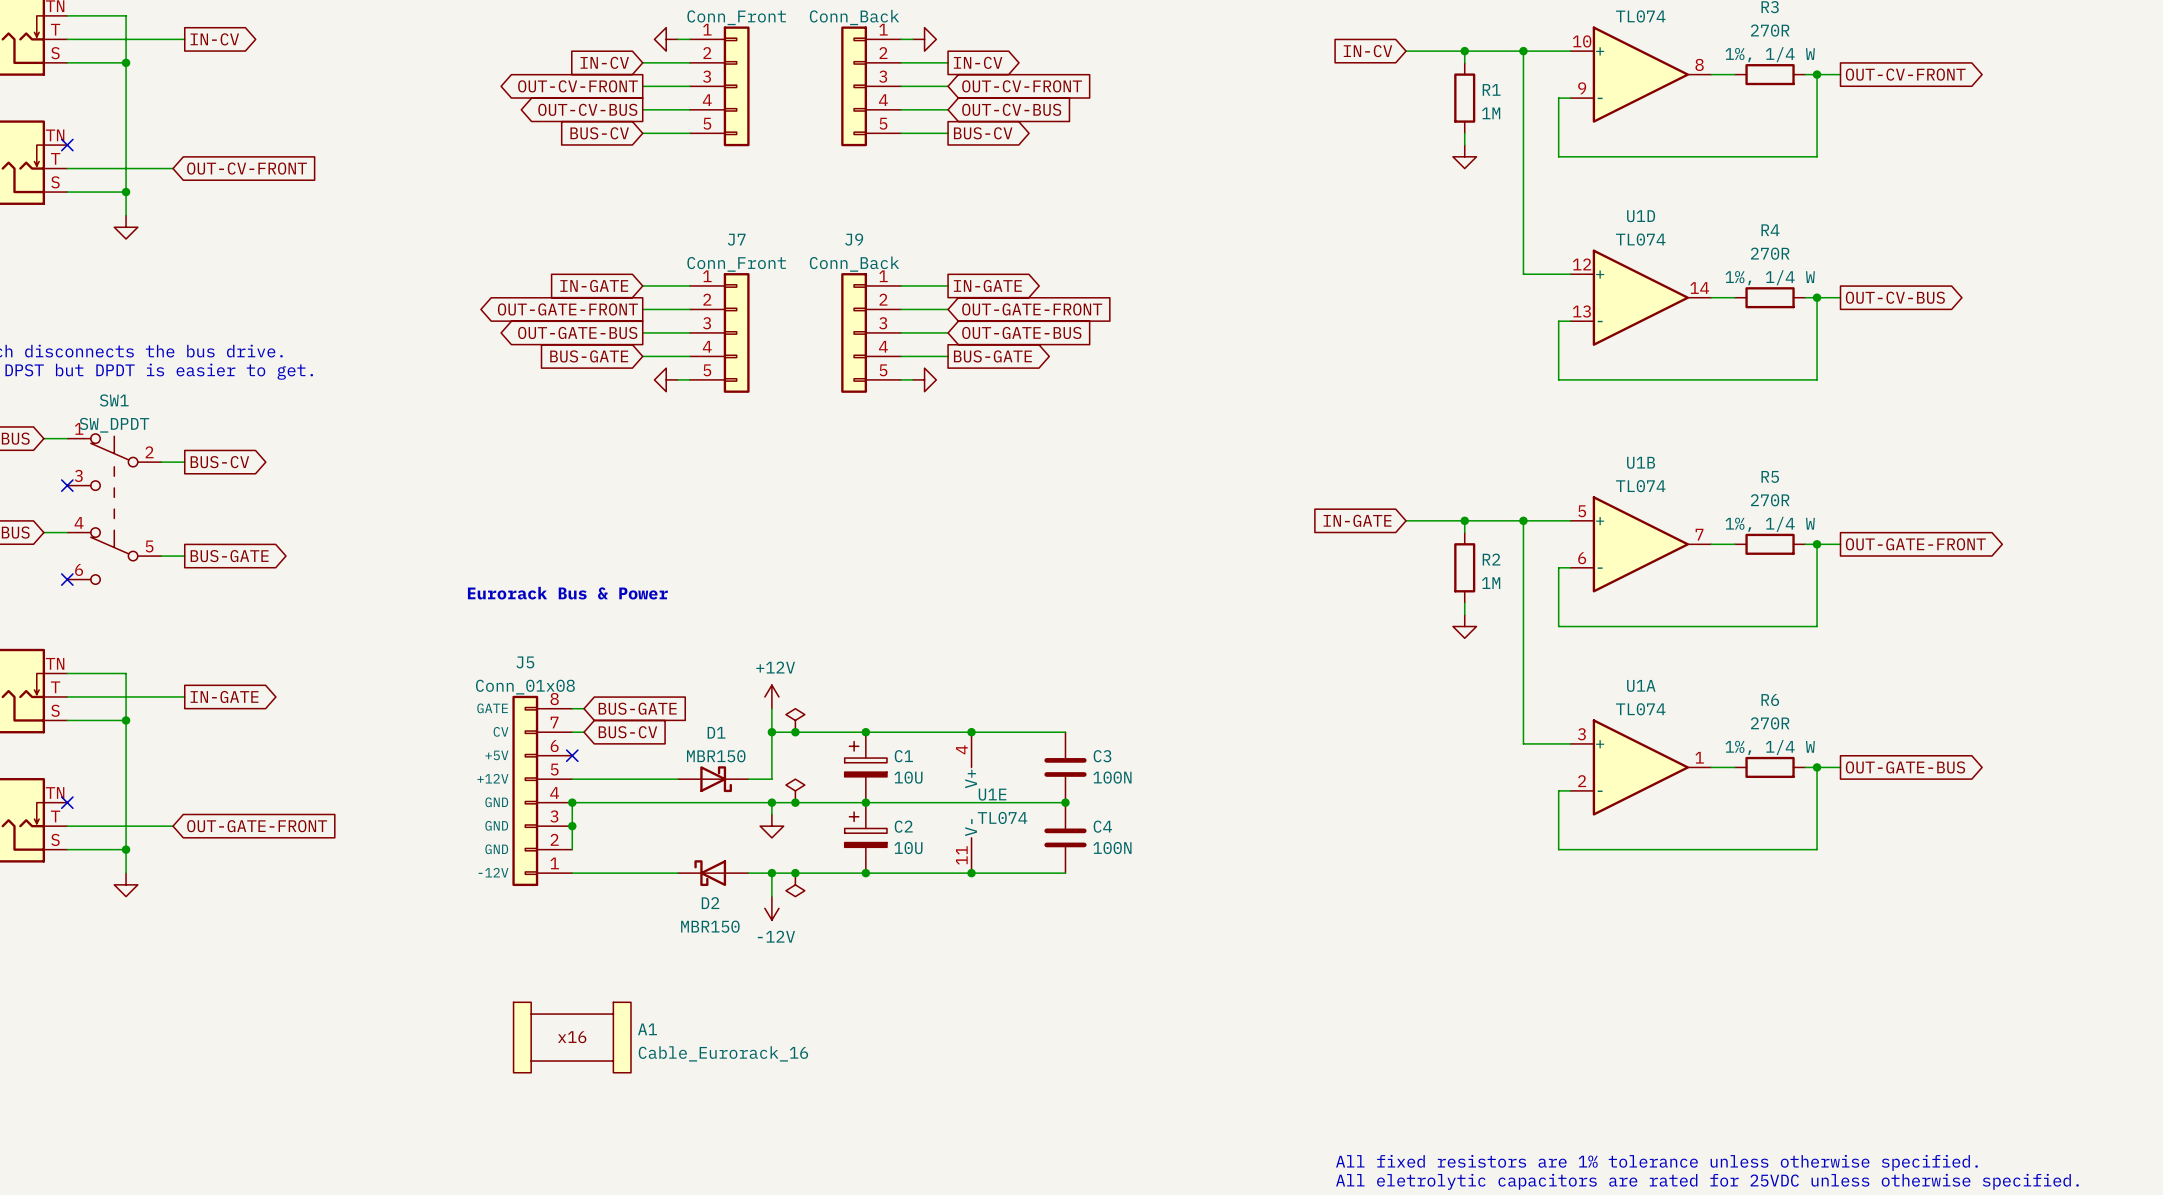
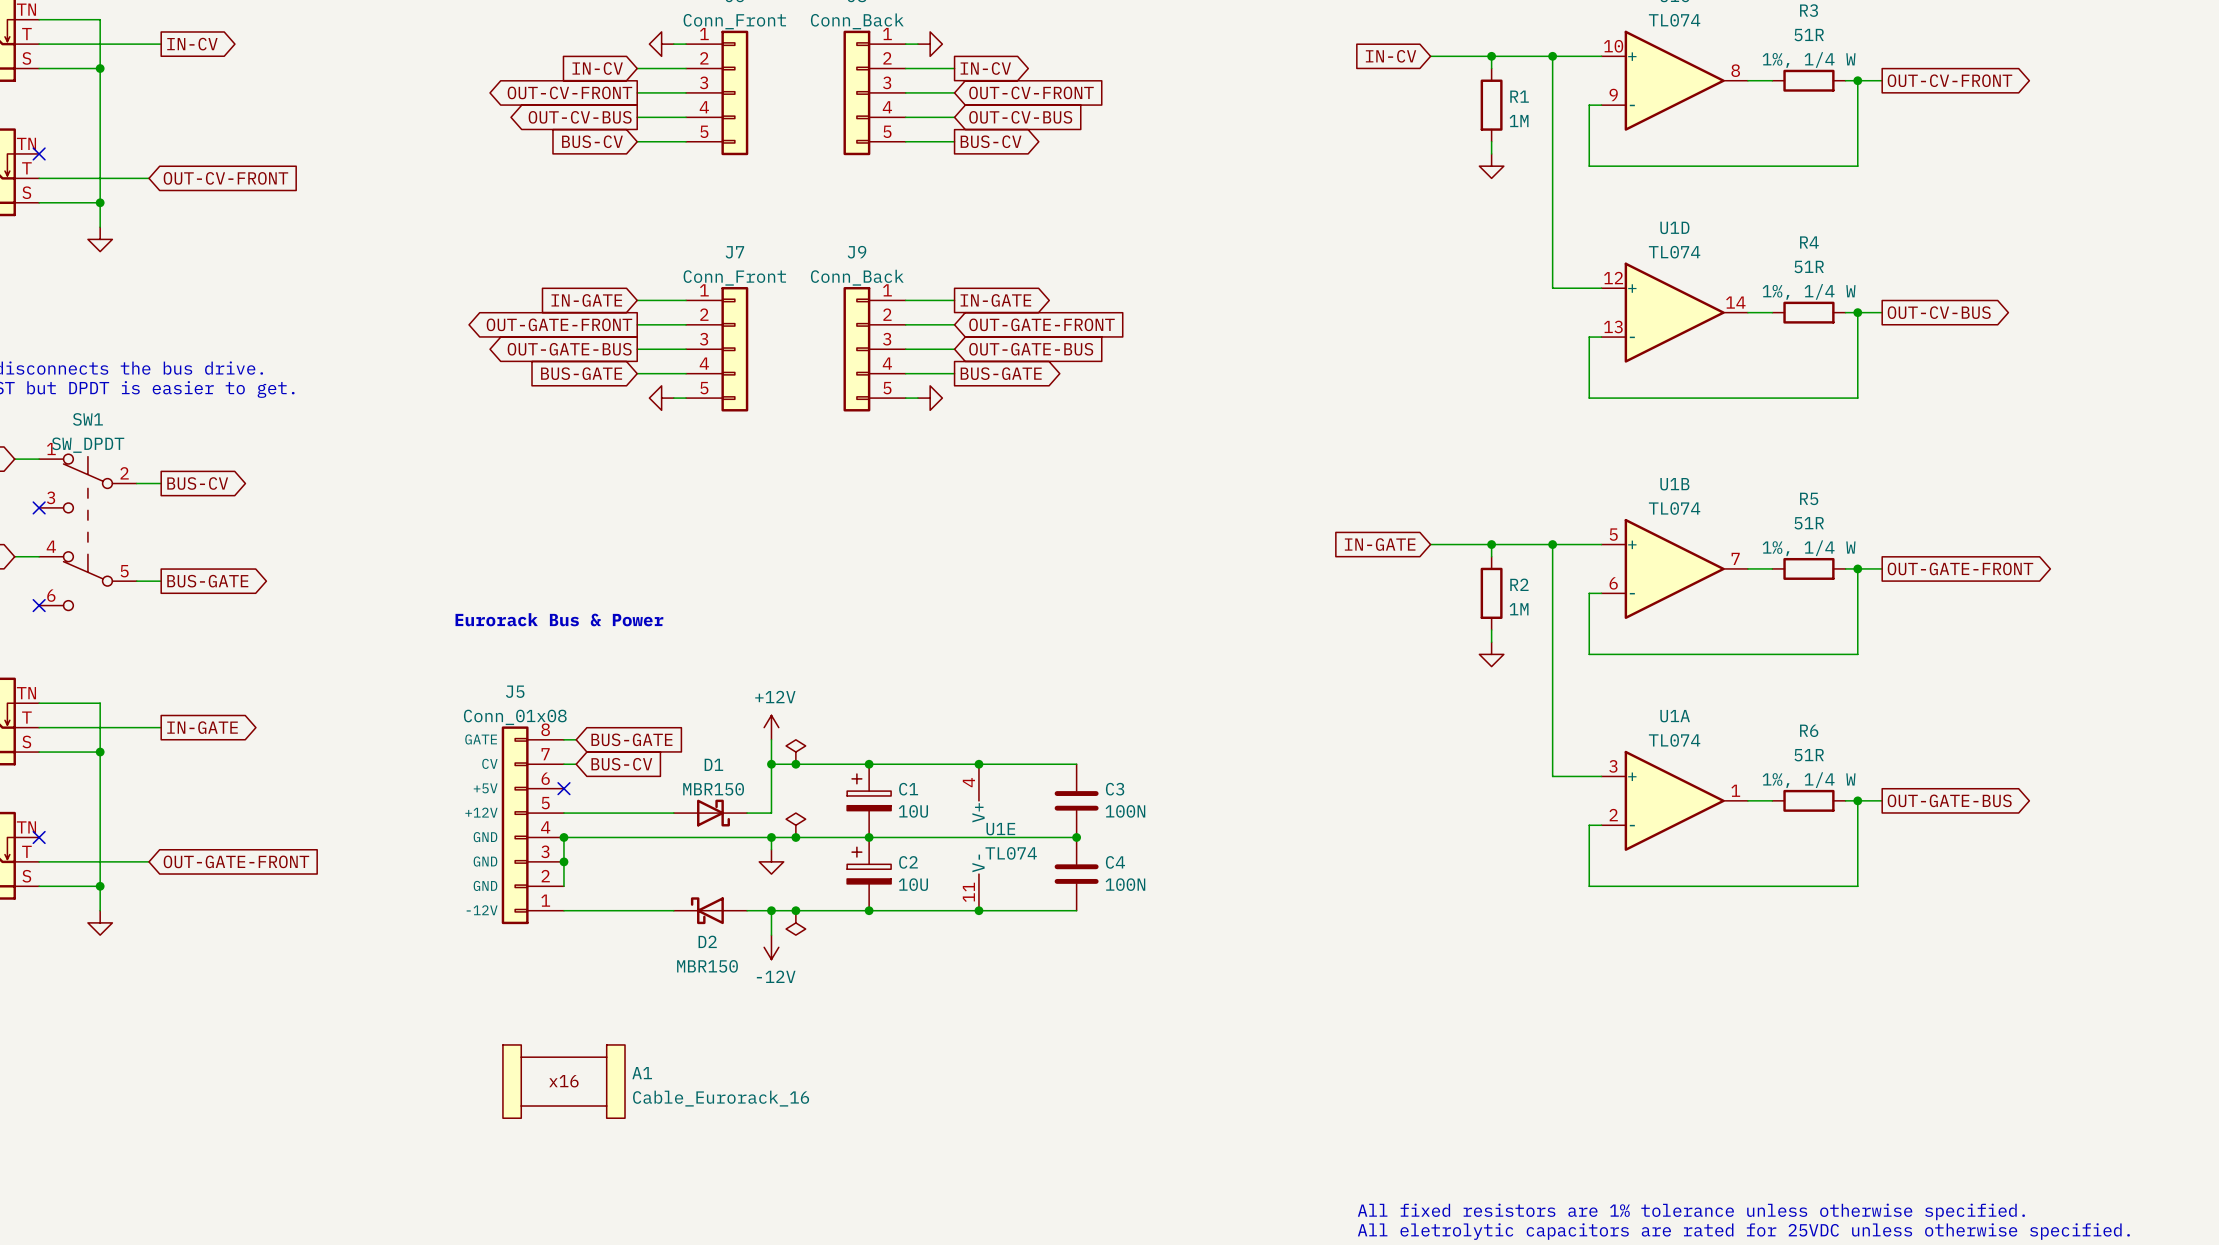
R3 value: 270R (1770, 30) -> 51R (1809, 35)
R4 value: 270R (1770, 253) -> 51R (1809, 266)
R5 value: 270R (1770, 500) -> 51R (1809, 523)
R6 value: 270R (1770, 723) -> 51R (1809, 755)

